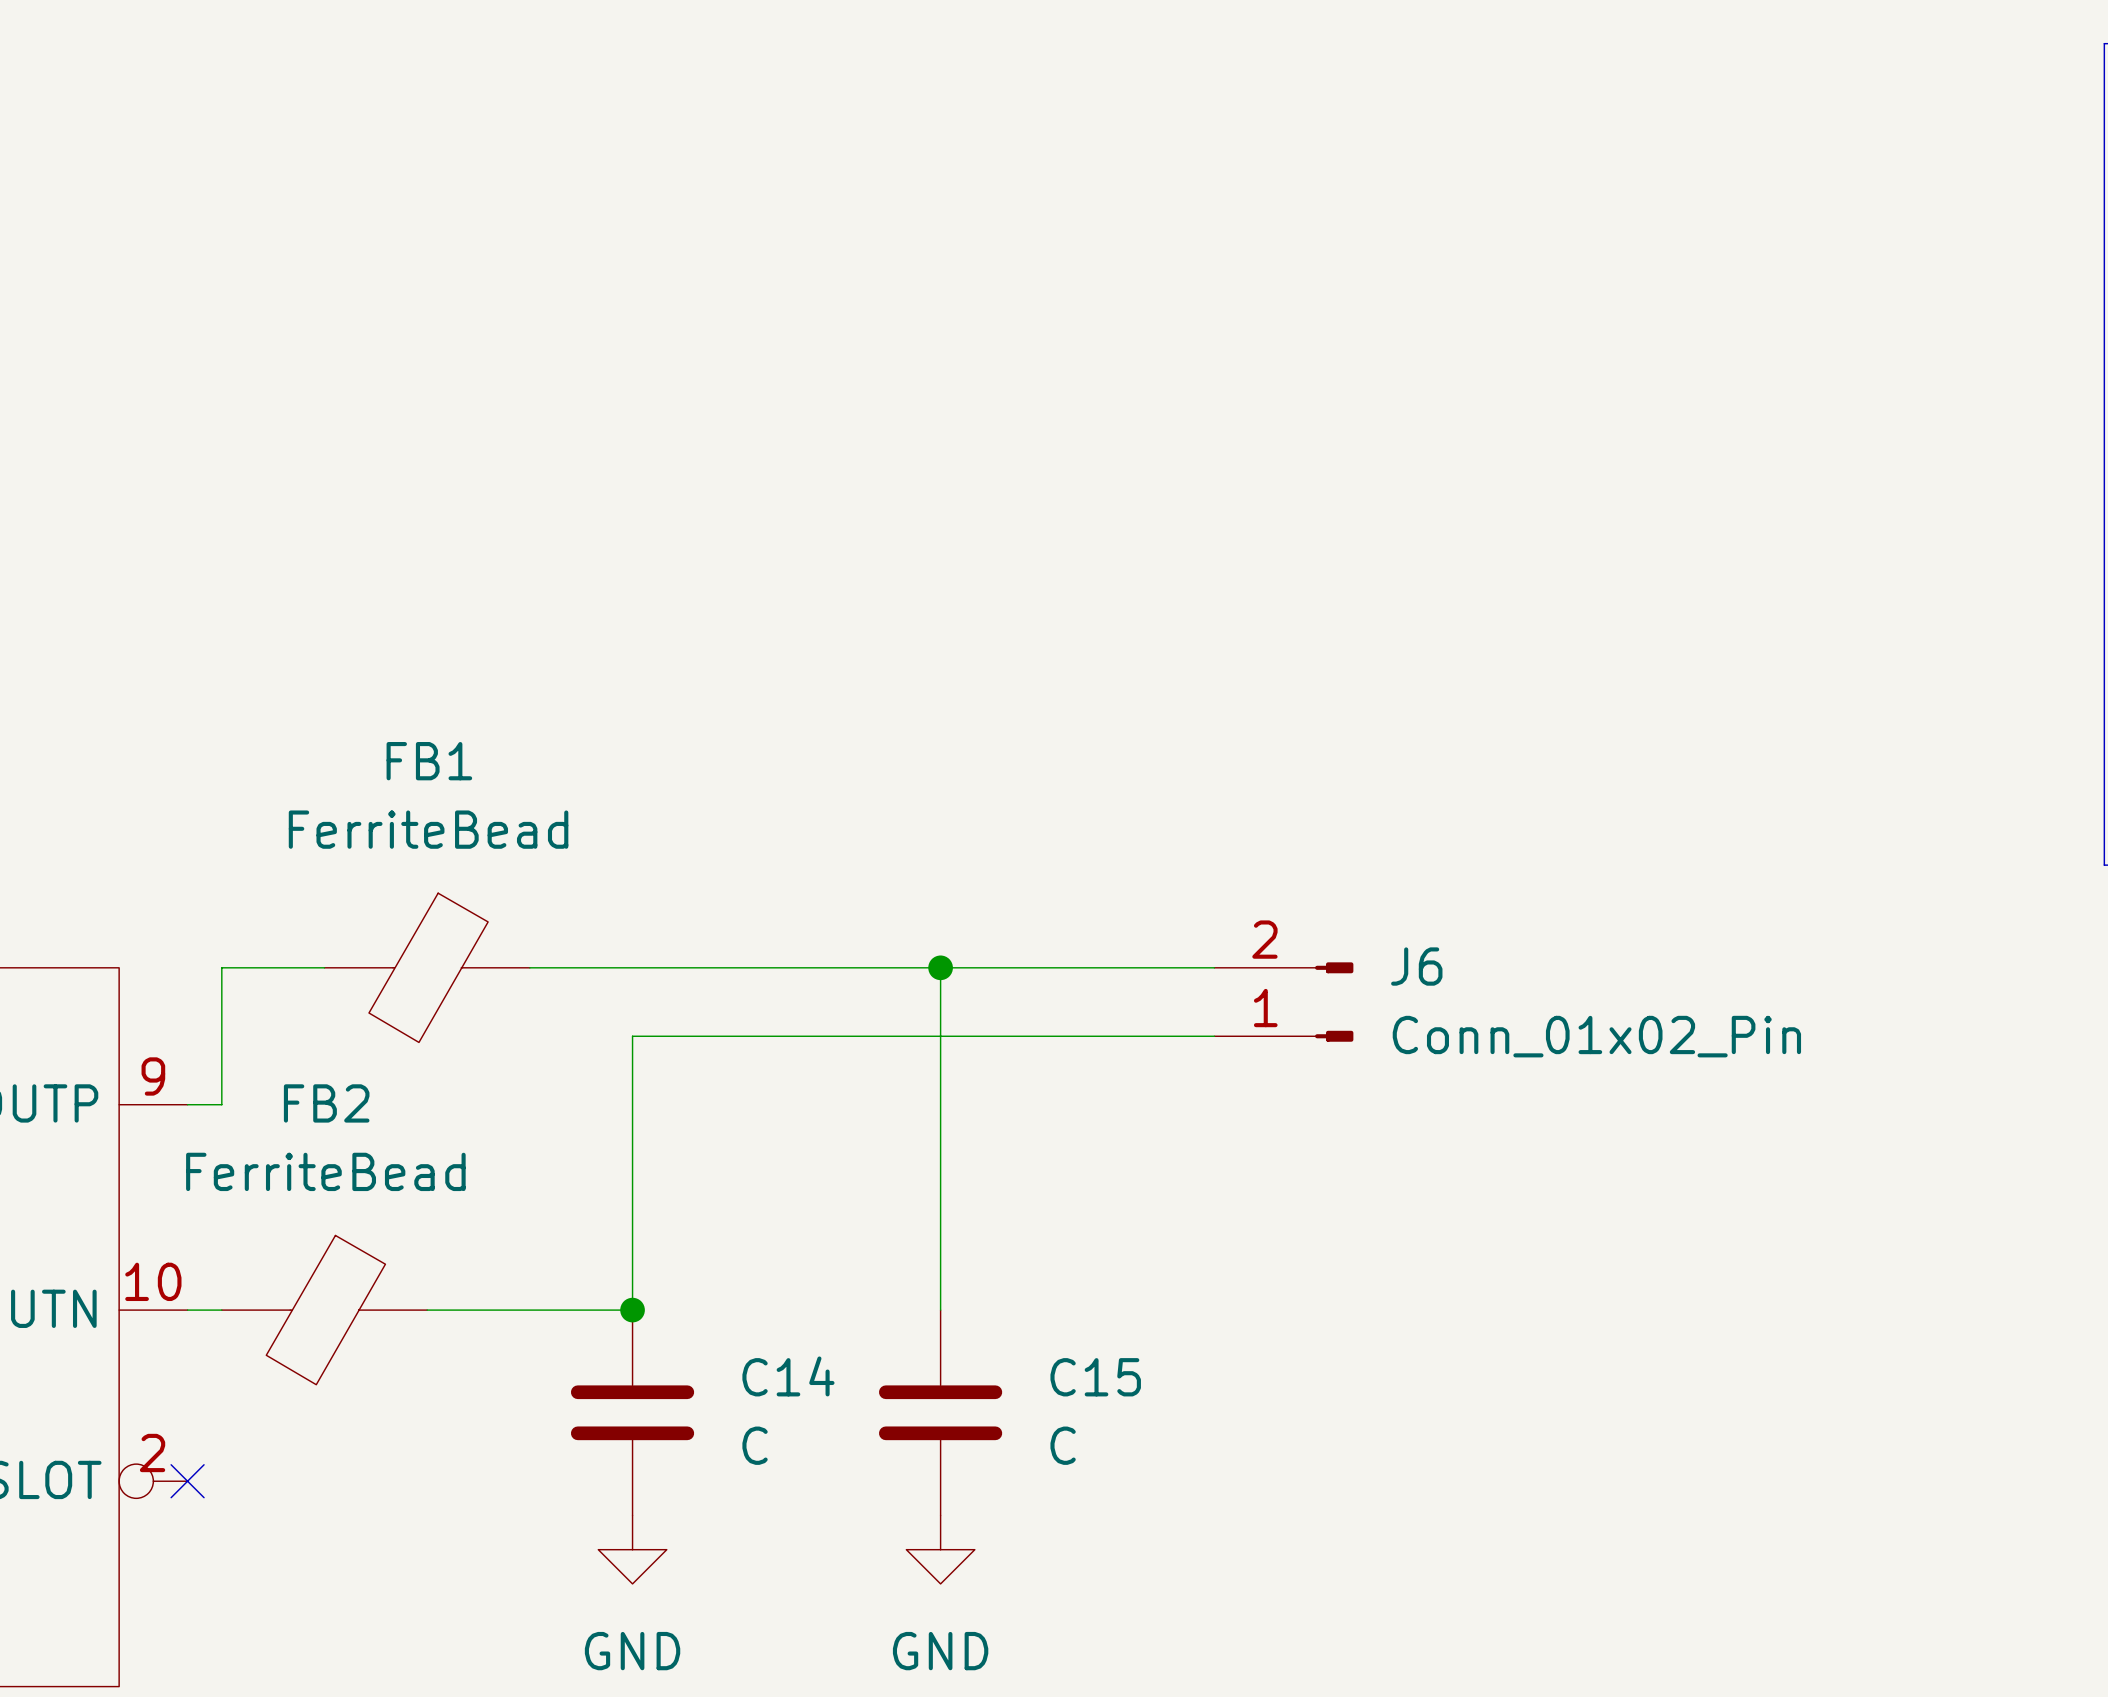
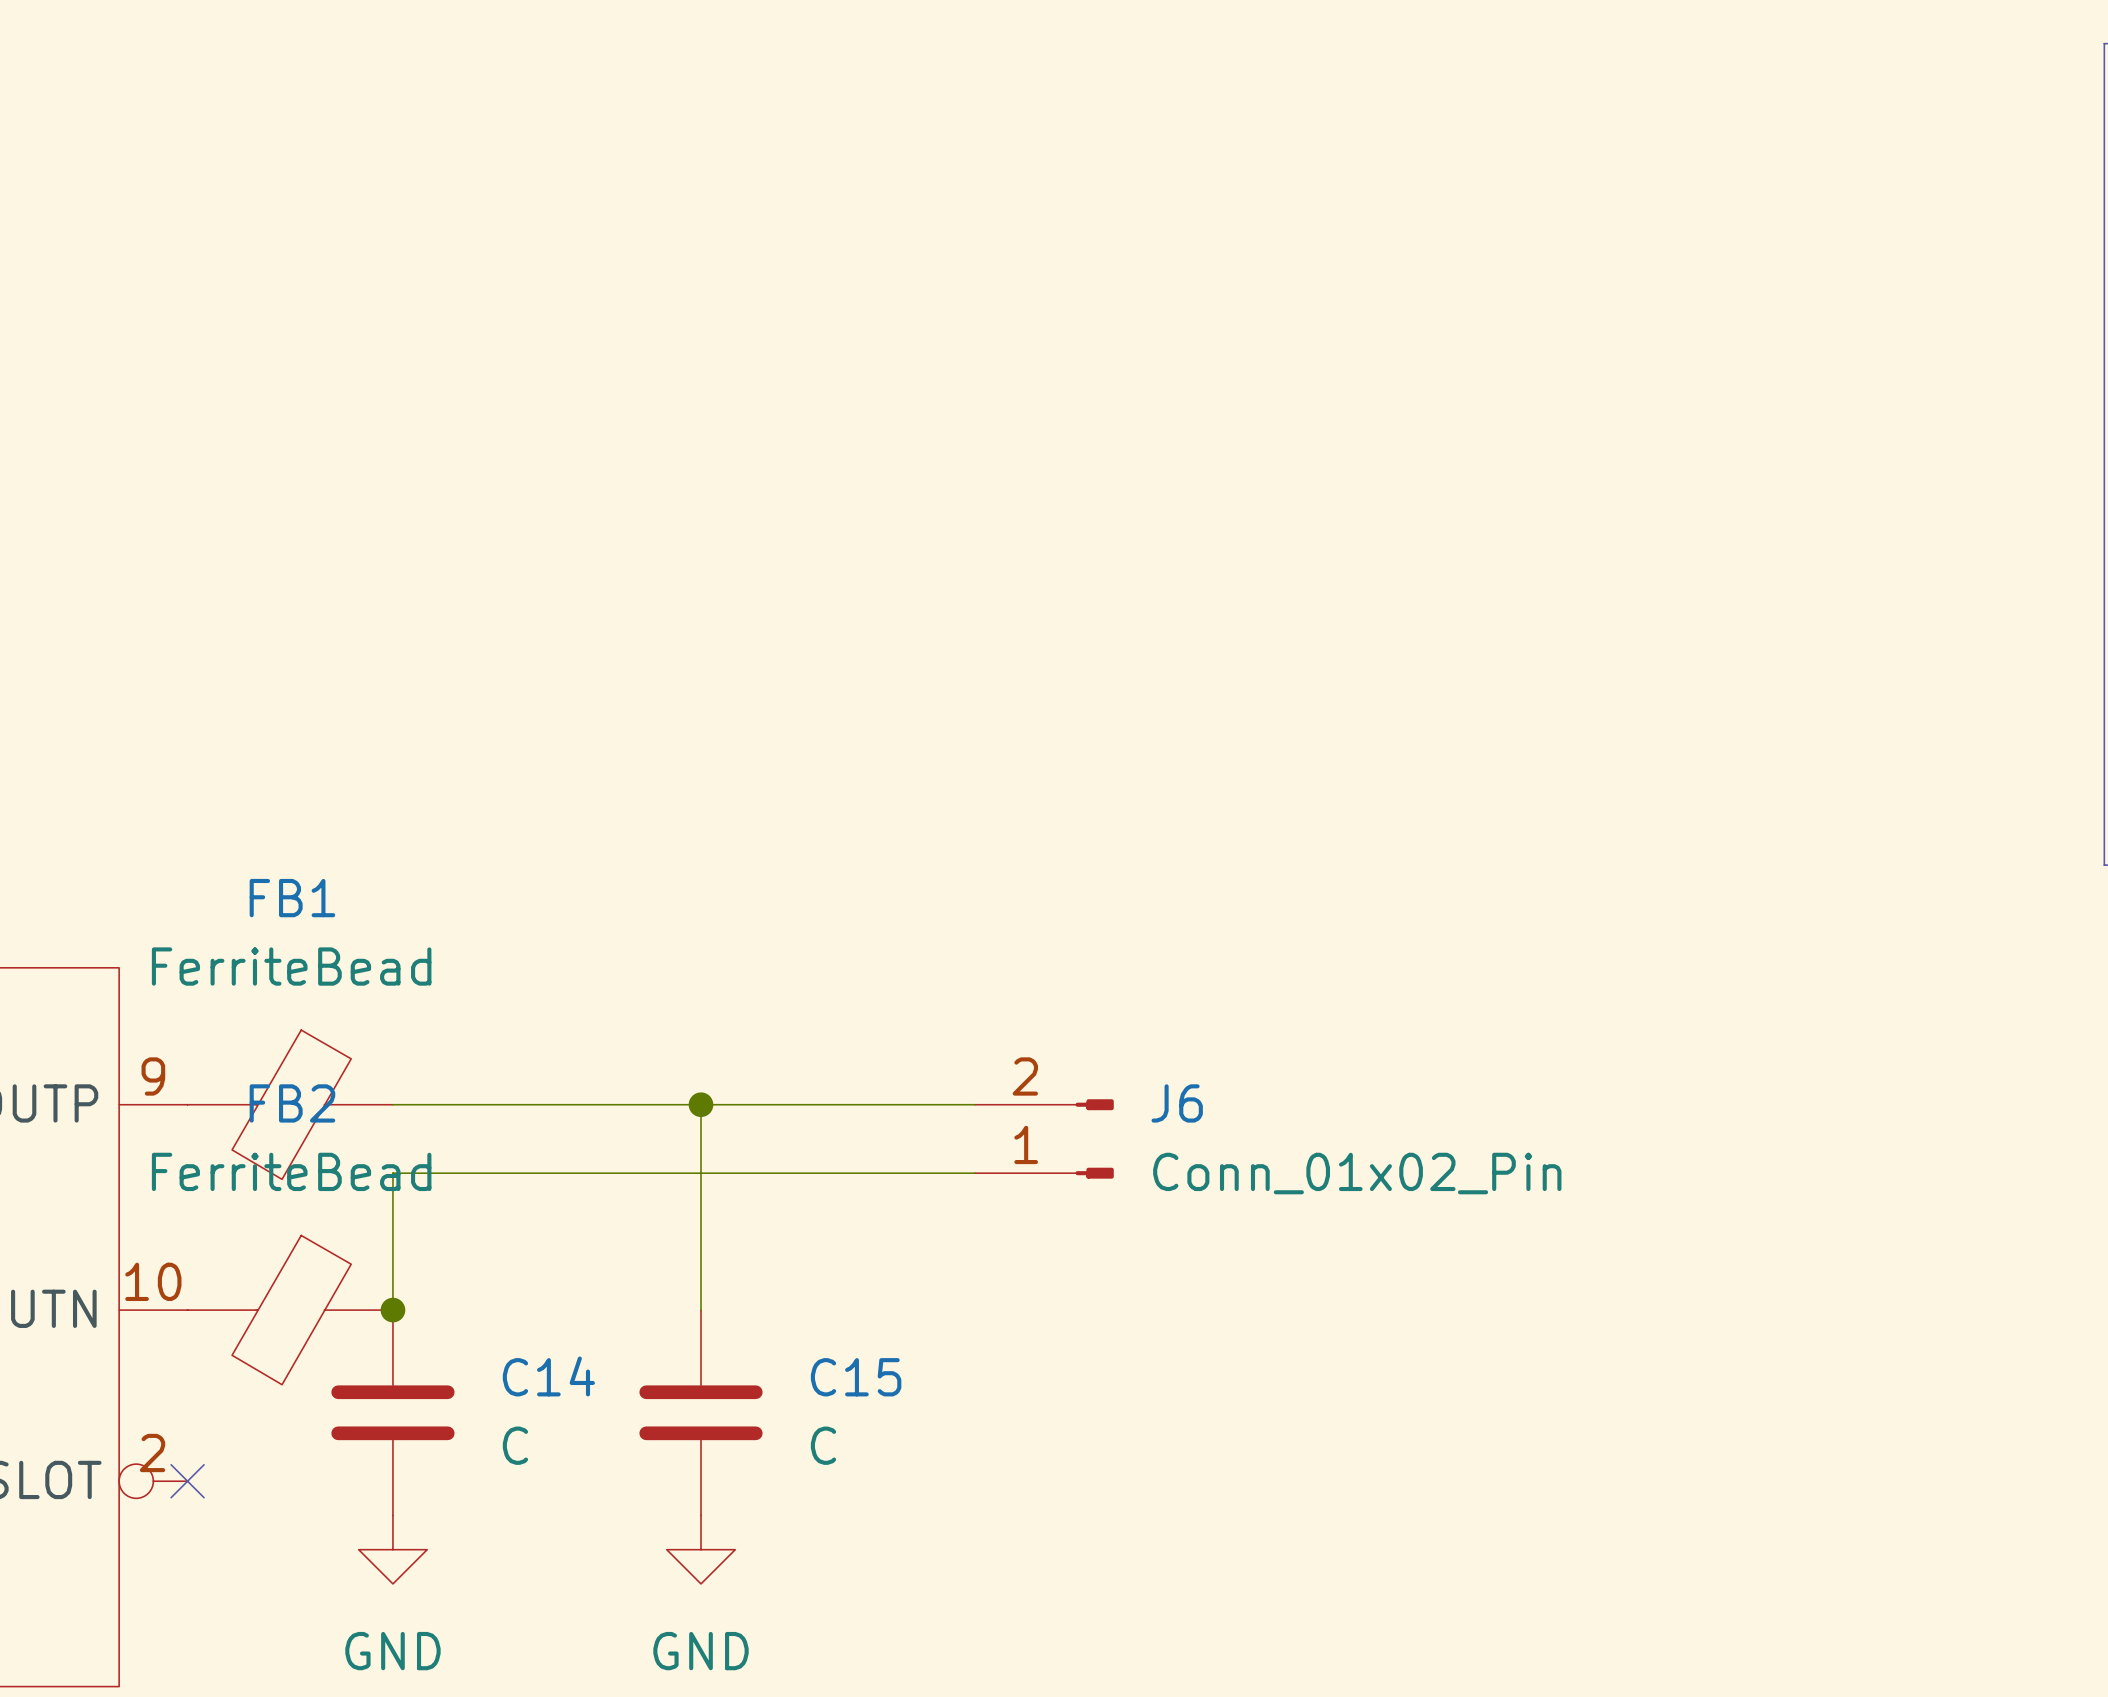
wire: (324, 967) (221, 967) (221, 1104) (187, 1104) -> none
FB1 position: (427, 967) -> (290, 1104)
wire: (529, 967) (1214, 967) -> none
wire: (940, 967) (940, 1310) -> none
junction: (940, 967) -> none
J6 position: (1283, 1002) -> (1044, 1138)
wire: (1214, 1036) (632, 1036) (632, 1310) (427, 1310) -> none
wire: none -> (392, 1104) (974, 1104)
wire: none -> (701, 1104) (701, 1310)
junction: none -> (701, 1104)
wire: none -> (974, 1173) (392, 1173) (392, 1310)
FB2 position: (324, 1310) -> (290, 1310)
junction: none -> (392, 1310)
junction: (632, 1310) -> none
C14 position: (632, 1412) -> (392, 1412)
C15 position: (940, 1412) -> (701, 1412)
power symbol: none -> GND (392, 1549)
power symbol position: GND (632, 1549) -> GND (701, 1549)
power symbol: GND (940, 1549) -> none

